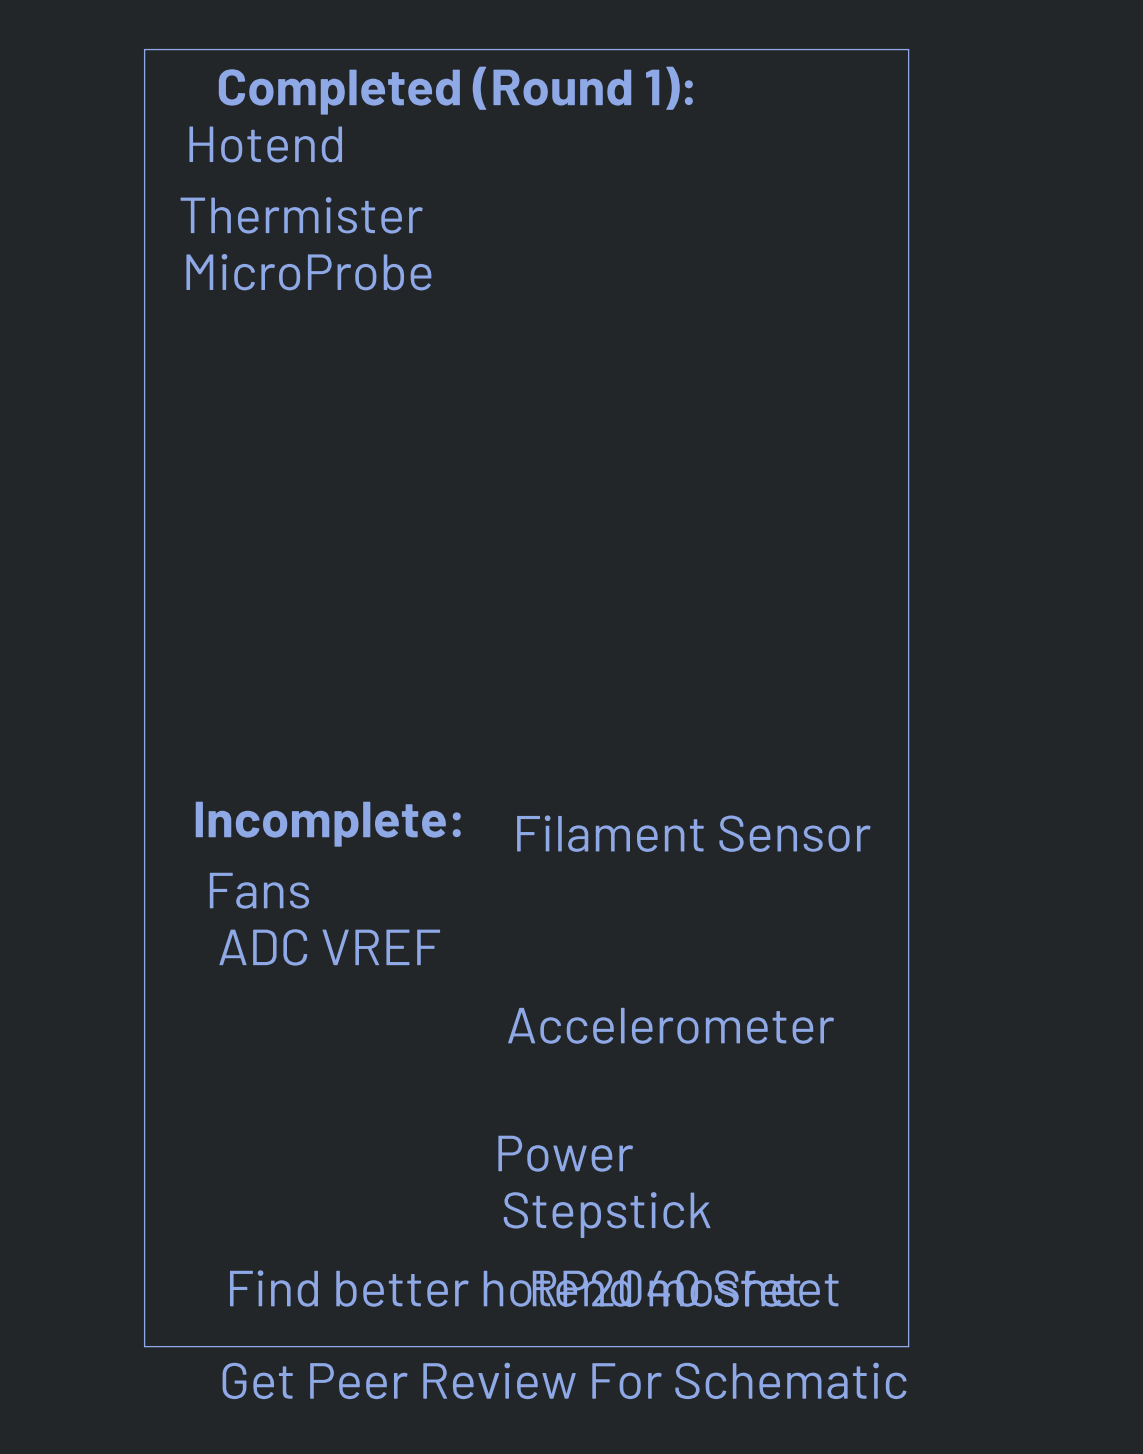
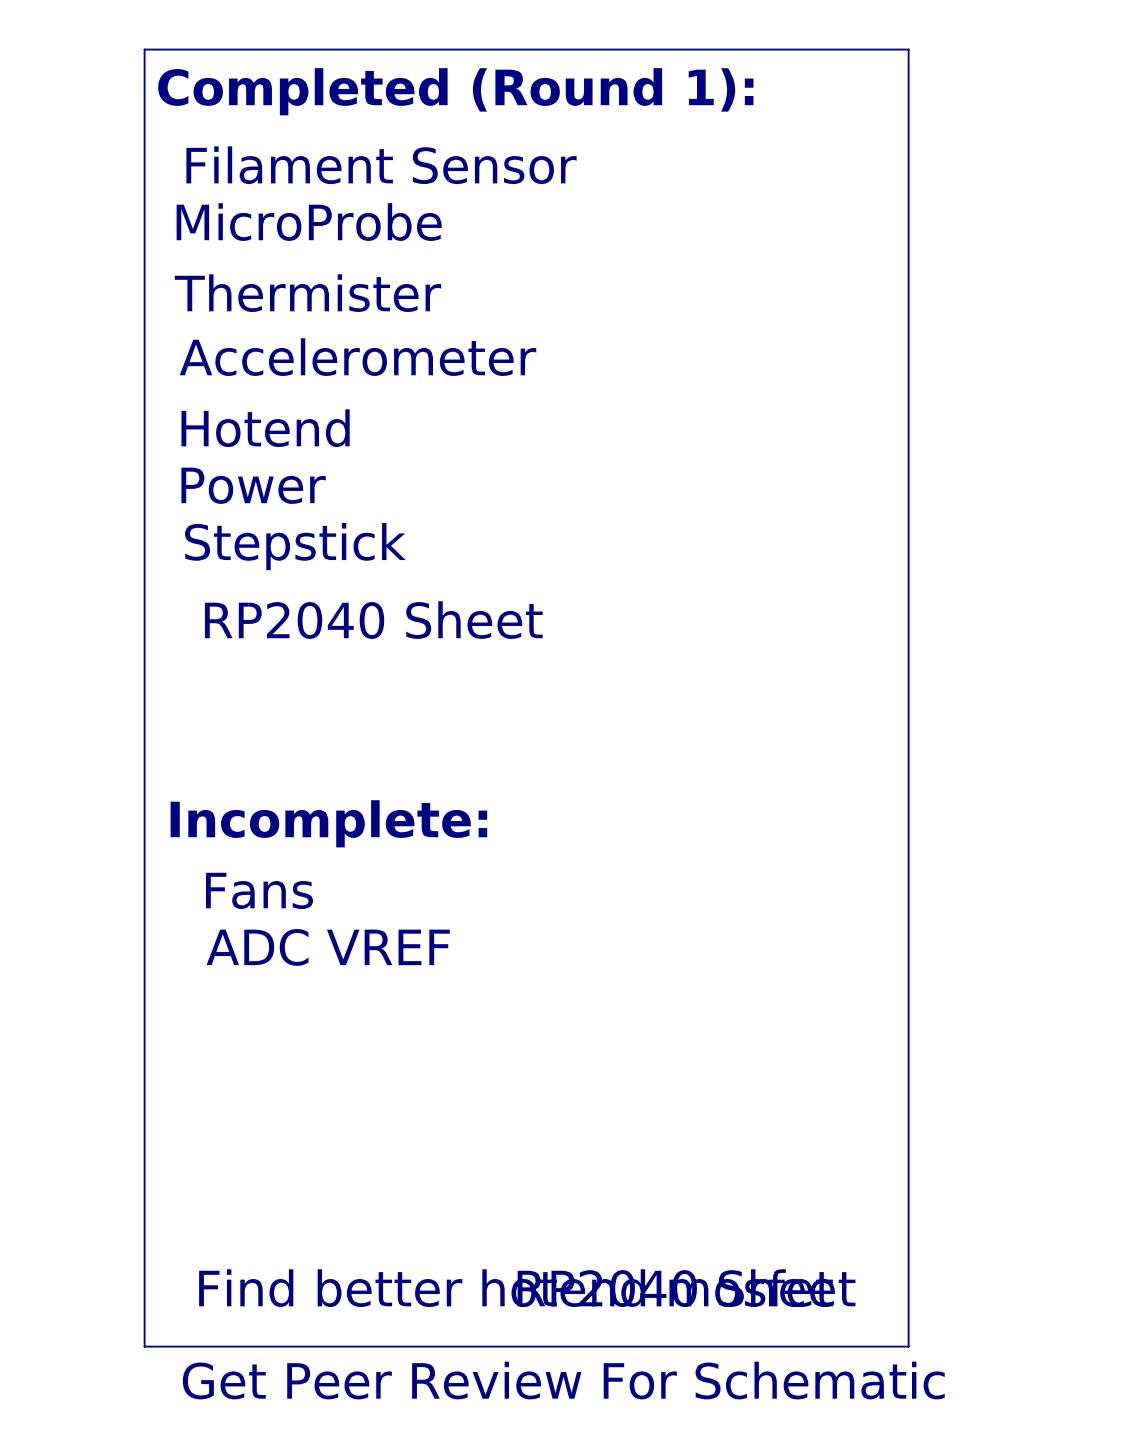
text position: Hotend (265, 144) -> Hotend (265, 428)
text: none -> Filament Sensor (381, 165)
text position: Thermister (301, 215) -> Thermister (307, 293)
text position: MicroProbe (308, 272) -> MicroProbe (309, 222)
text: none -> Accelerometer (358, 357)
text: none -> Power (253, 485)
text: none -> Stepstick (295, 546)
text: none -> RP2040 Sheet (373, 620)
text: Filament Sensor (693, 833) -> none
text: Accelerometer (670, 1025) -> none
text: Power (565, 1153) -> none
text: Stepstick (607, 1215) -> none

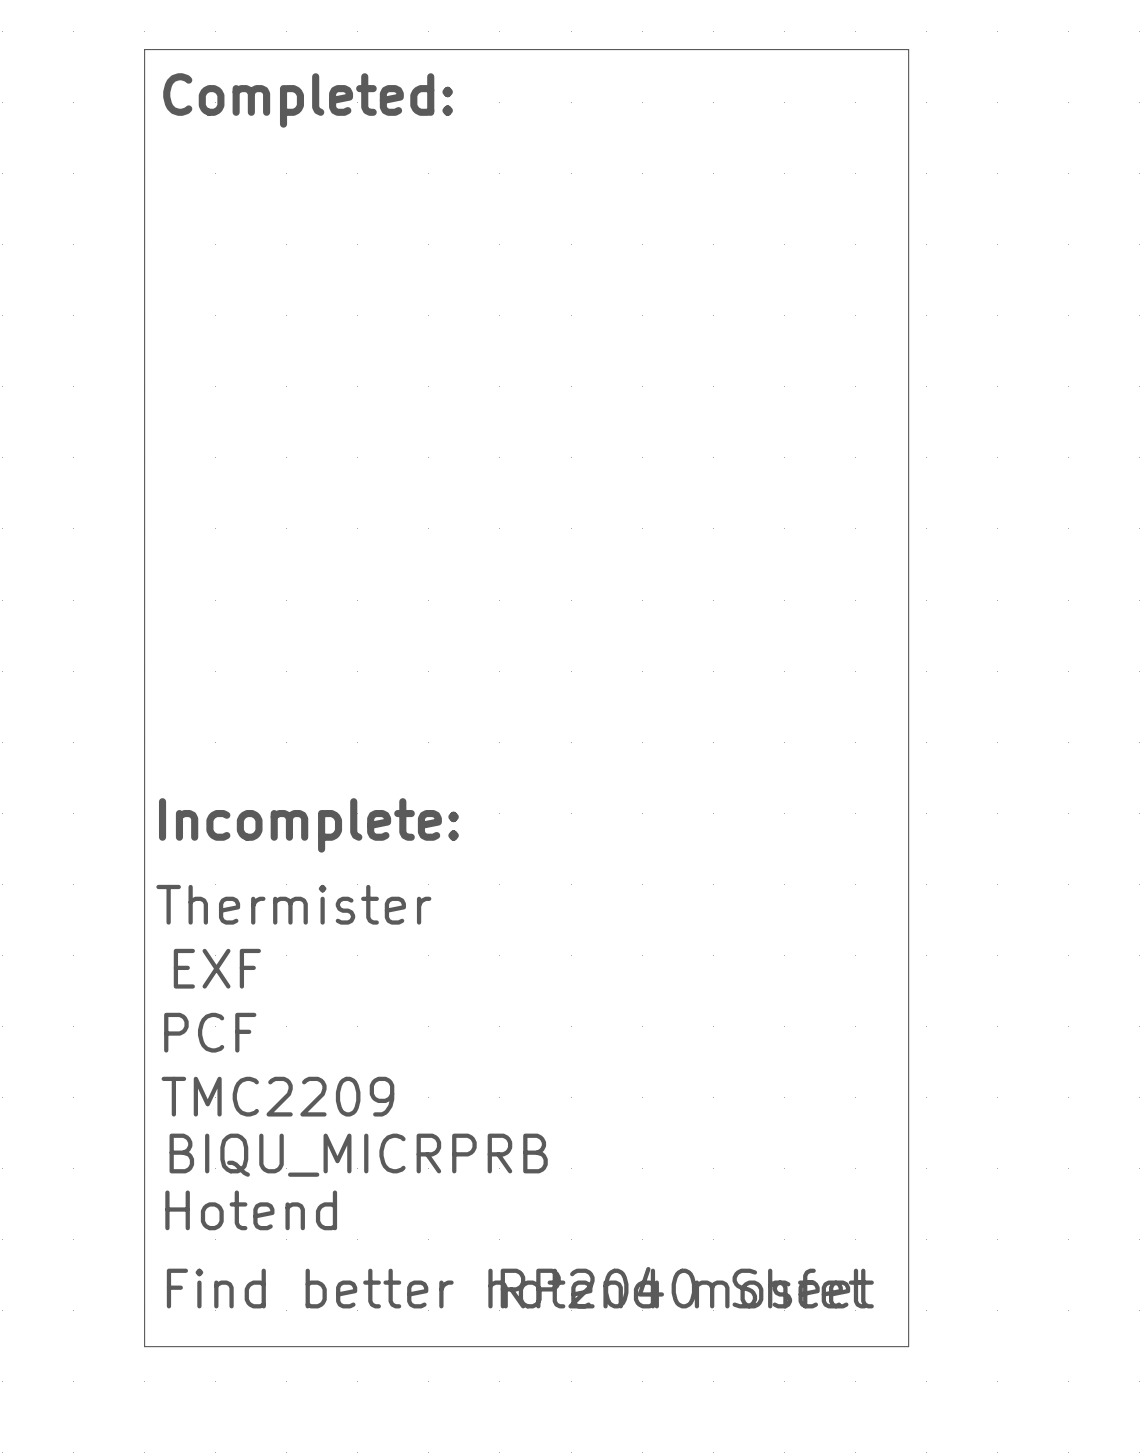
text: Completed (Round 1): (455, 91) -> Completed: (308, 100)
text: Filament Sensor (381, 165) -> none
text: MicroProbe (309, 222) -> none
text position: Thermister (307, 293) -> Thermister (293, 904)
text: Accelerometer (358, 357) -> none
text: Hotend (265, 428) -> none
text: Power (253, 485) -> none
text: Stepstick (295, 546) -> none
text: RP2040 Sheet (373, 620) -> none
text position: Incomplete: (328, 823) -> Incomplete: (308, 825)
text: Fans (259, 890) -> none
text: ADC VREF (328, 947) -> none
text: none -> EXF (217, 968)
text: none -> PCF (210, 1032)
text: none -> TMC2209 (277, 1096)
text: none -> BIQU_MICRPRB (358, 1155)
text: none -> Hotend (251, 1210)
text: Get Peer Review For Schematic (563, 1380) -> none

